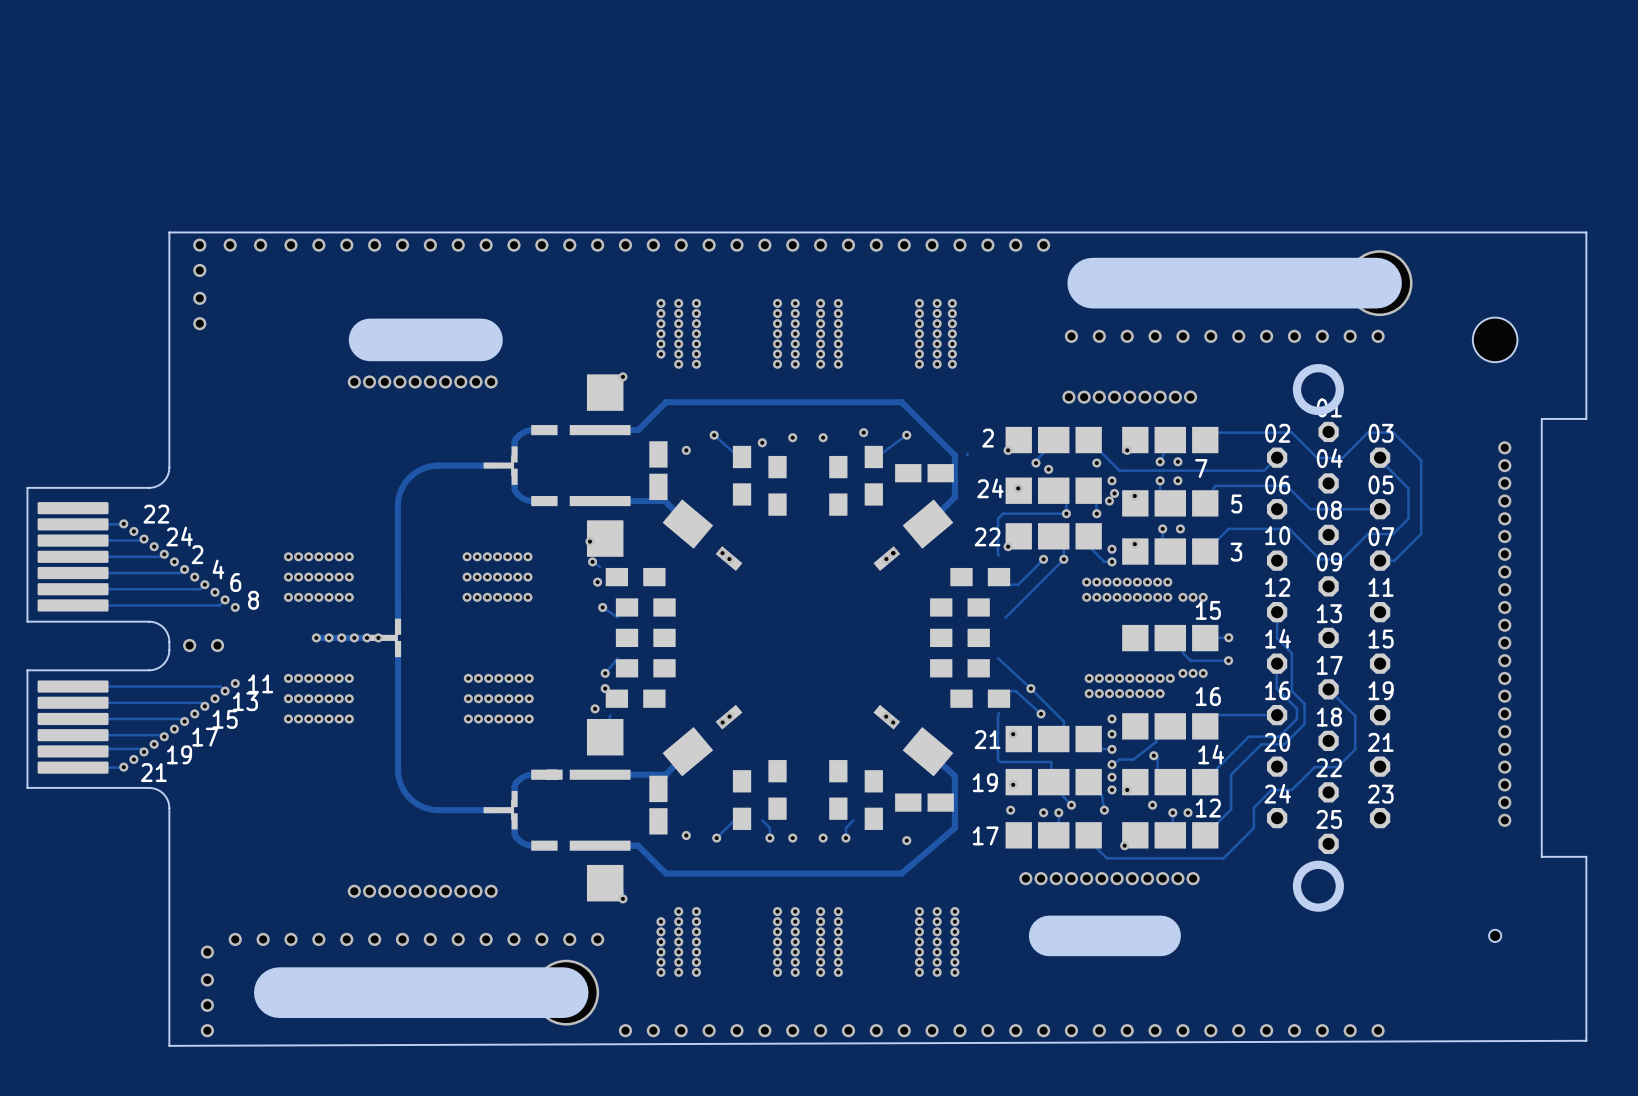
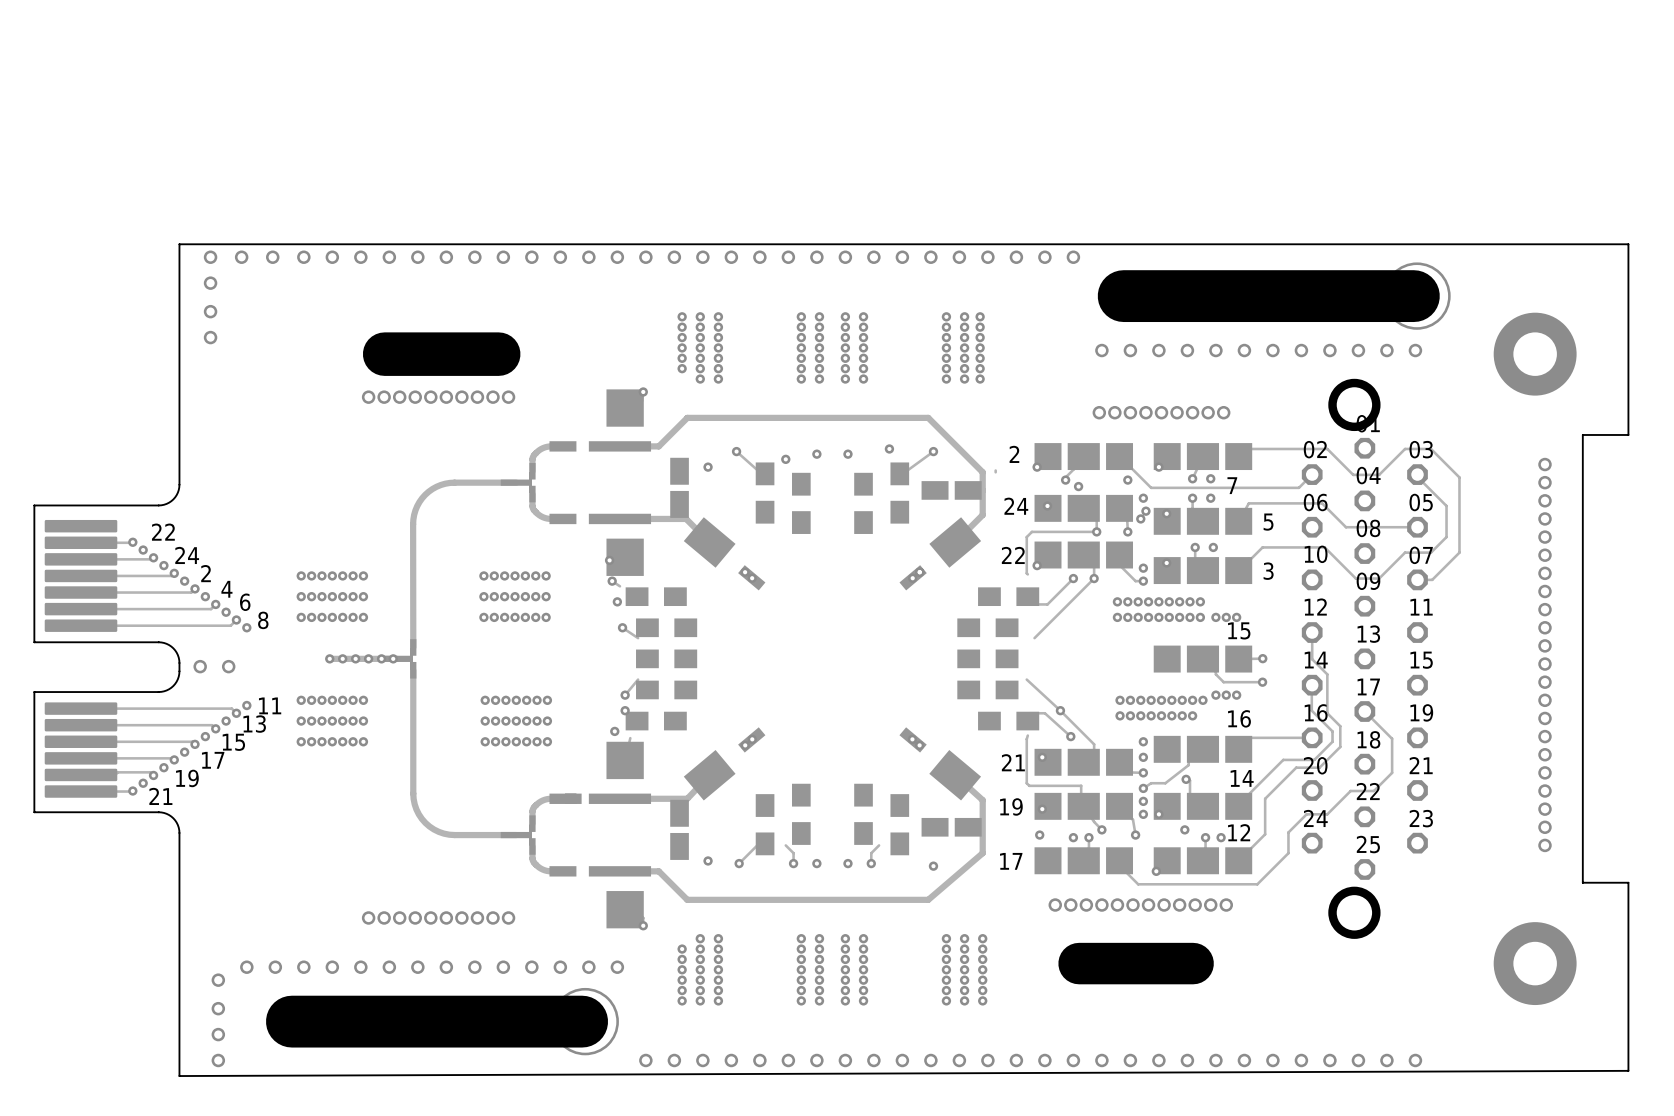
hole: (1495, 339) -> none
via: none -> (1535, 354)
hole: (1495, 935) -> none
via: none -> (1535, 963)

